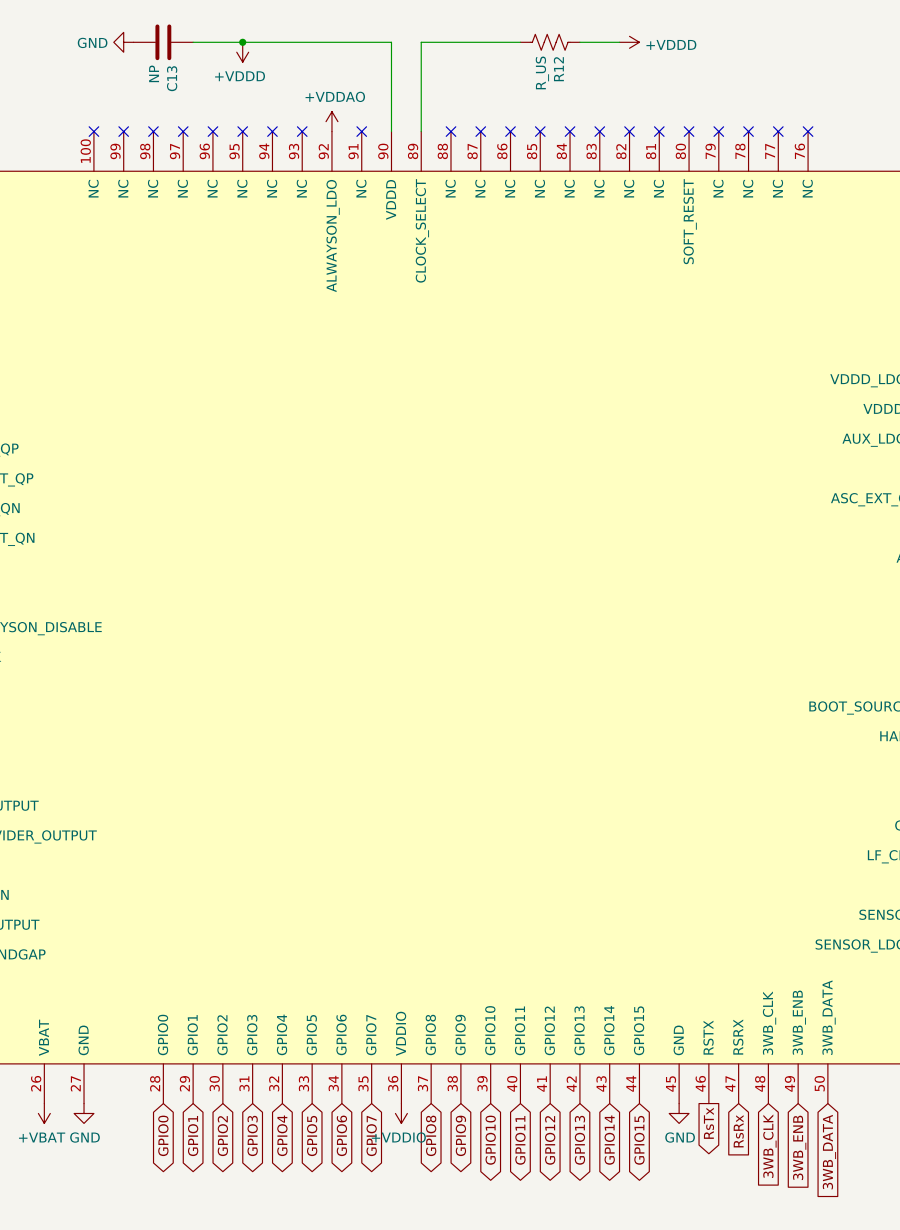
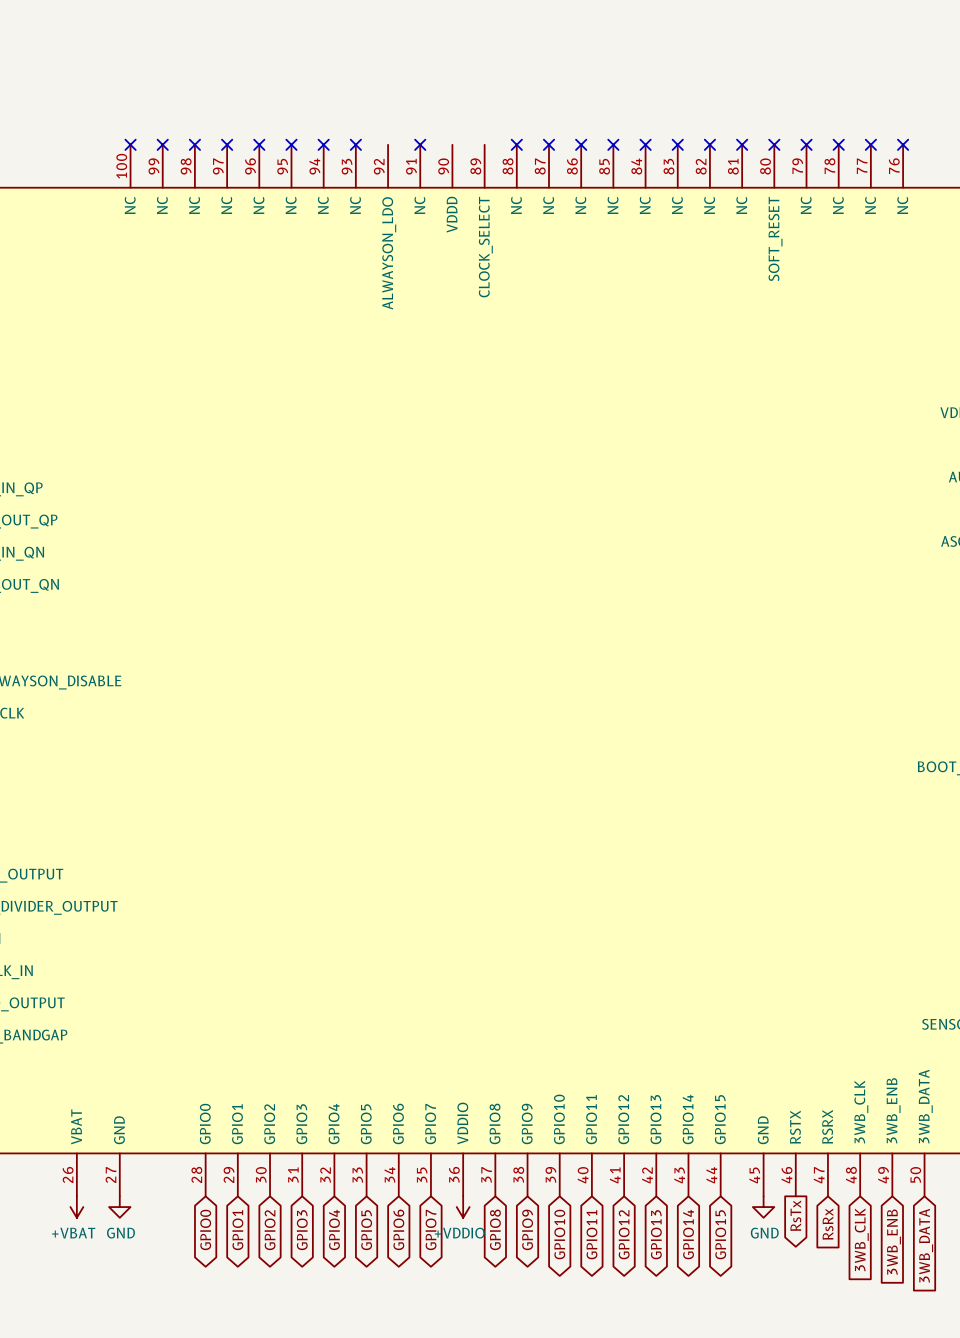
power symbol: GND (123, 42) -> none
C13: NP (163, 42) -> none
wire: (193, 42) (391, 42) (391, 131) -> none
junction: (242, 42) -> none
wire: (520, 42) (421, 42) (421, 131) -> none
R12: R_US (550, 42) -> none
wire: (579, 42) (619, 42) -> none
power symbol: +VDDD (629, 42) -> none
power symbol: +VDDD (242, 52) -> none
power symbol: +VDDAO (331, 121) -> none

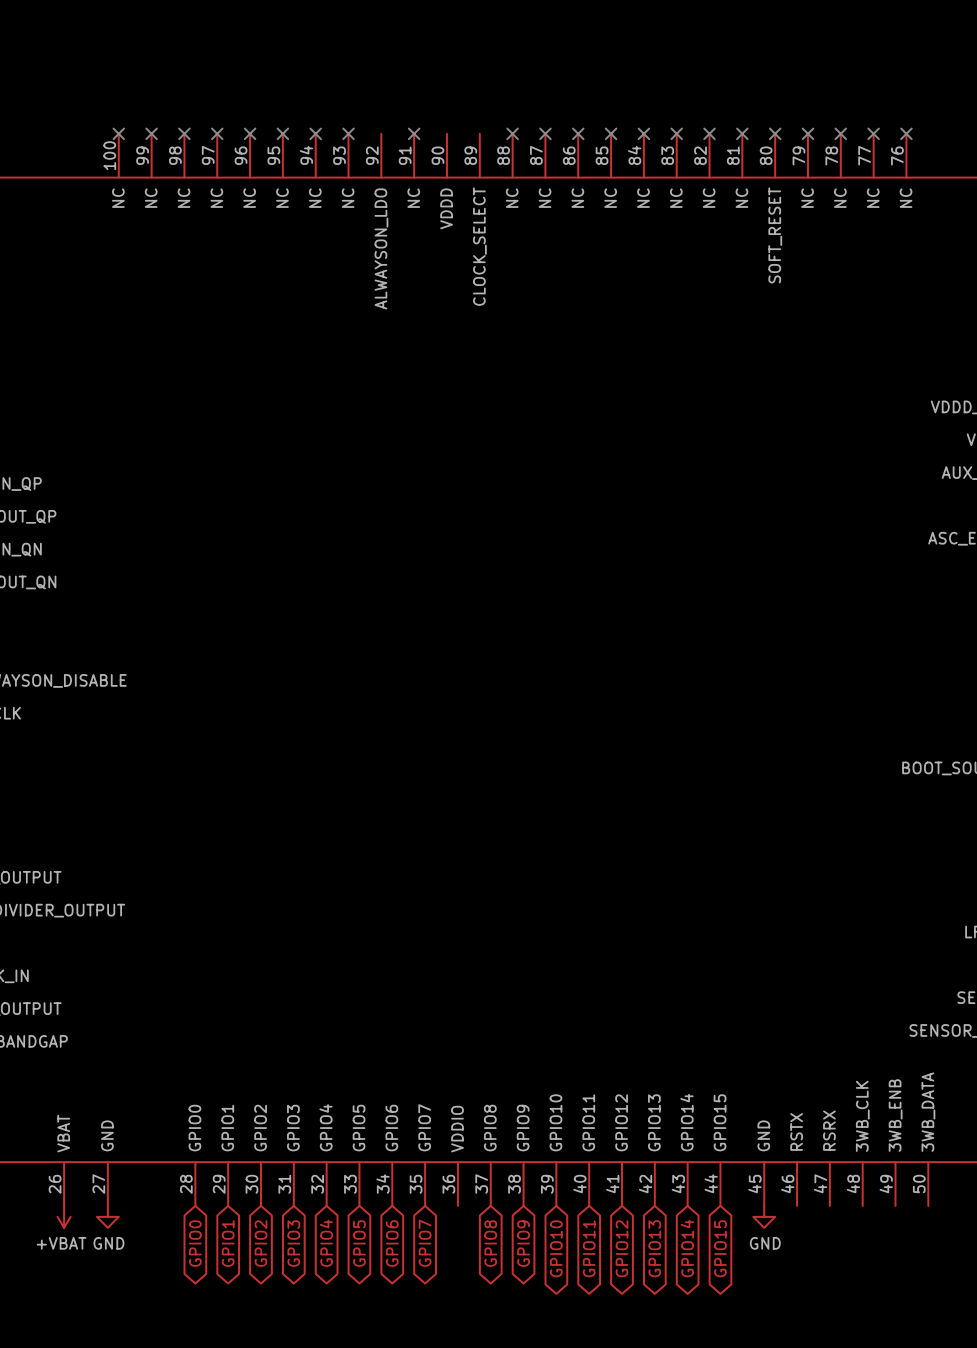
power symbol: +VDDIO (463, 1207) -> none
global label: RsTx (795, 1215) -> none
global label: RsRx (828, 1224) -> none
global label: 3WB_CLK (861, 1239) -> none
global label: 3WB_ENB (893, 1242) -> none
global label: 3WB_DATA (926, 1245) -> none

